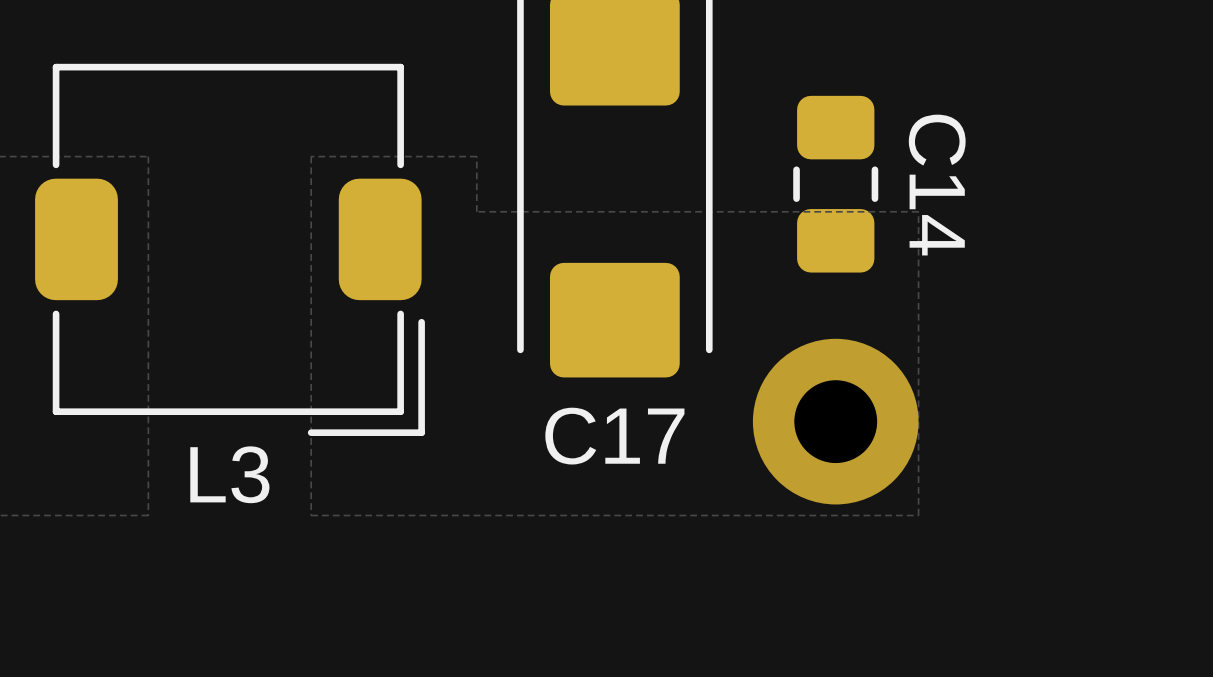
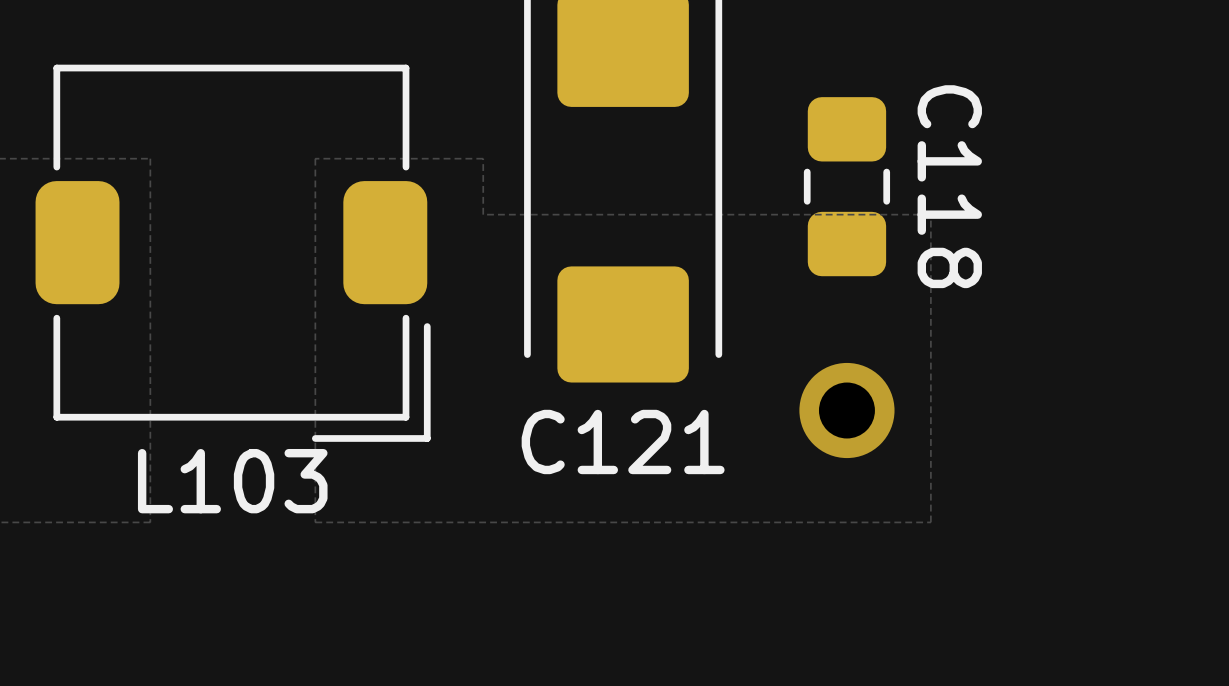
C14 name: C14 (937, 185) -> C118 (949, 186)
via size: [752, 338, 919, 505] -> [799, 362, 895, 459]
C17 name: C17 (614, 436) -> C121 (623, 441)
L3 name: L3 (229, 474) -> L103 (232, 481)

